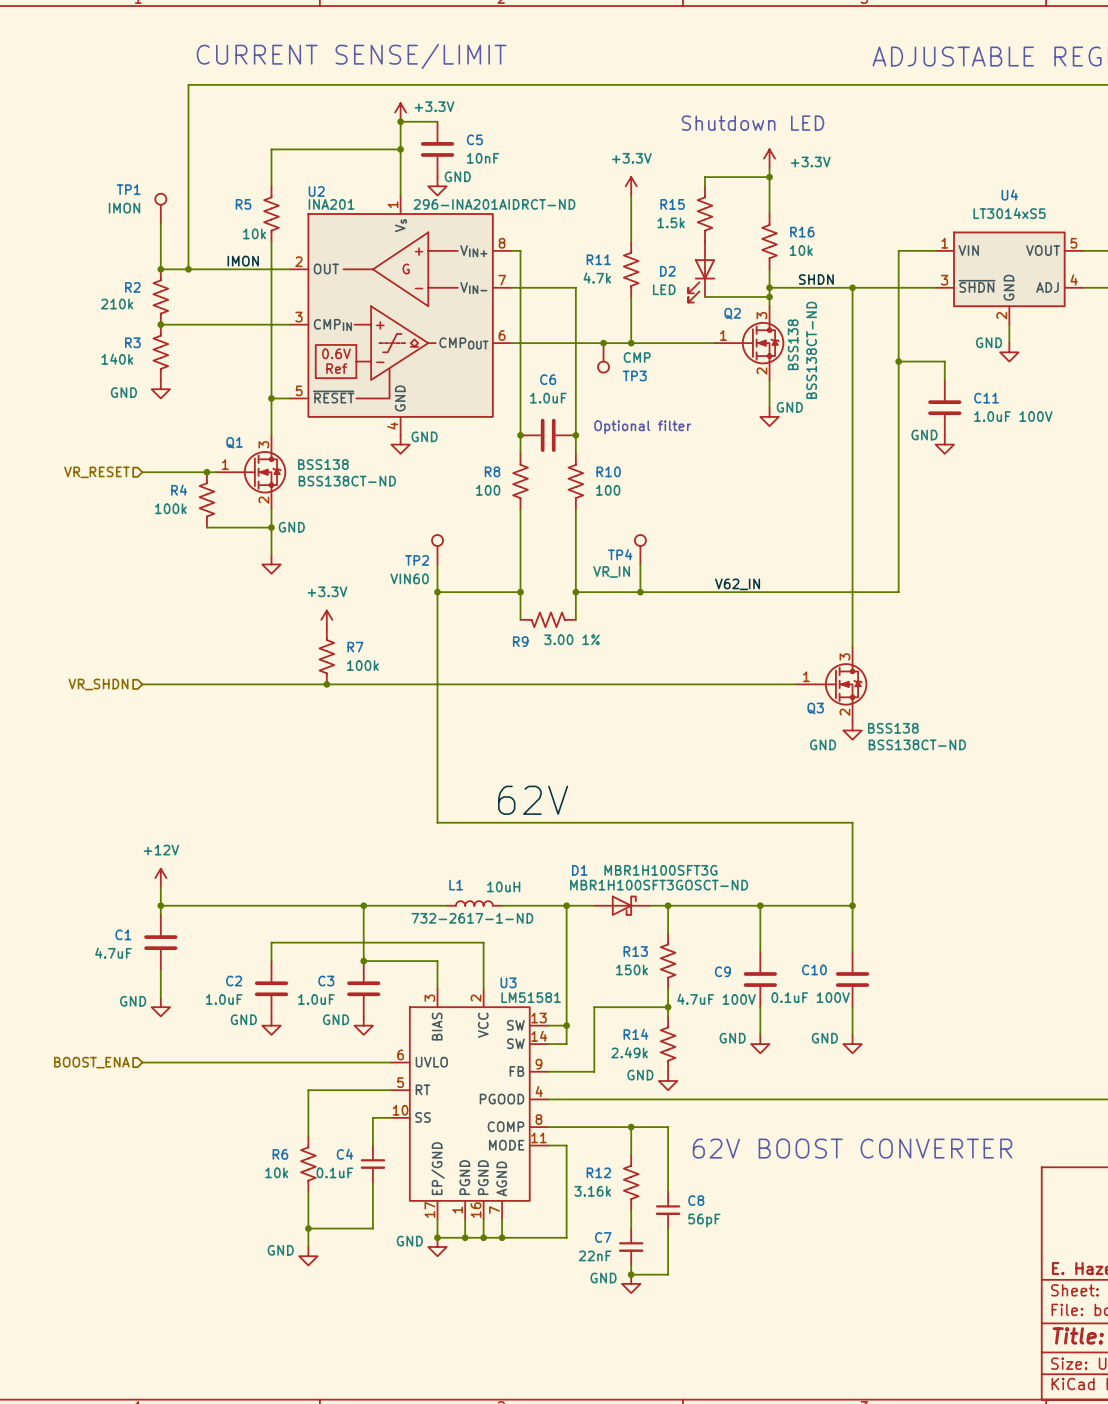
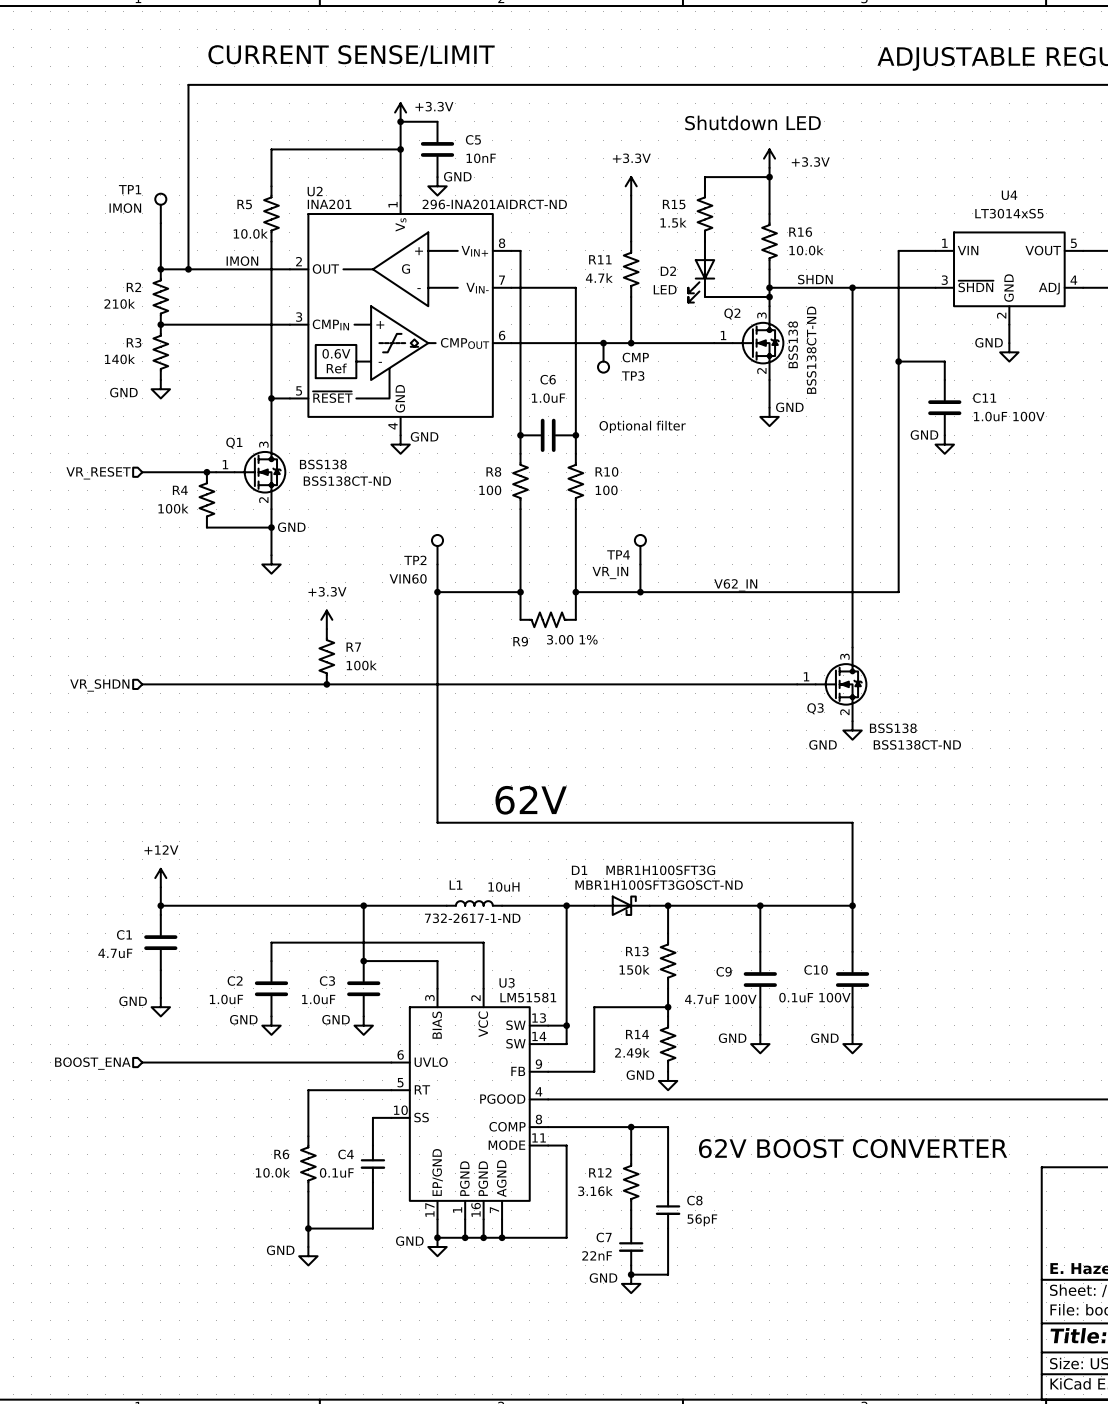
R5 value: 10k (254, 233) -> 10.0k (250, 233)
R16 value: 10k (801, 250) -> 10.0k (806, 250)
R6 value: 10k (276, 1172) -> 10.0k (272, 1172)

